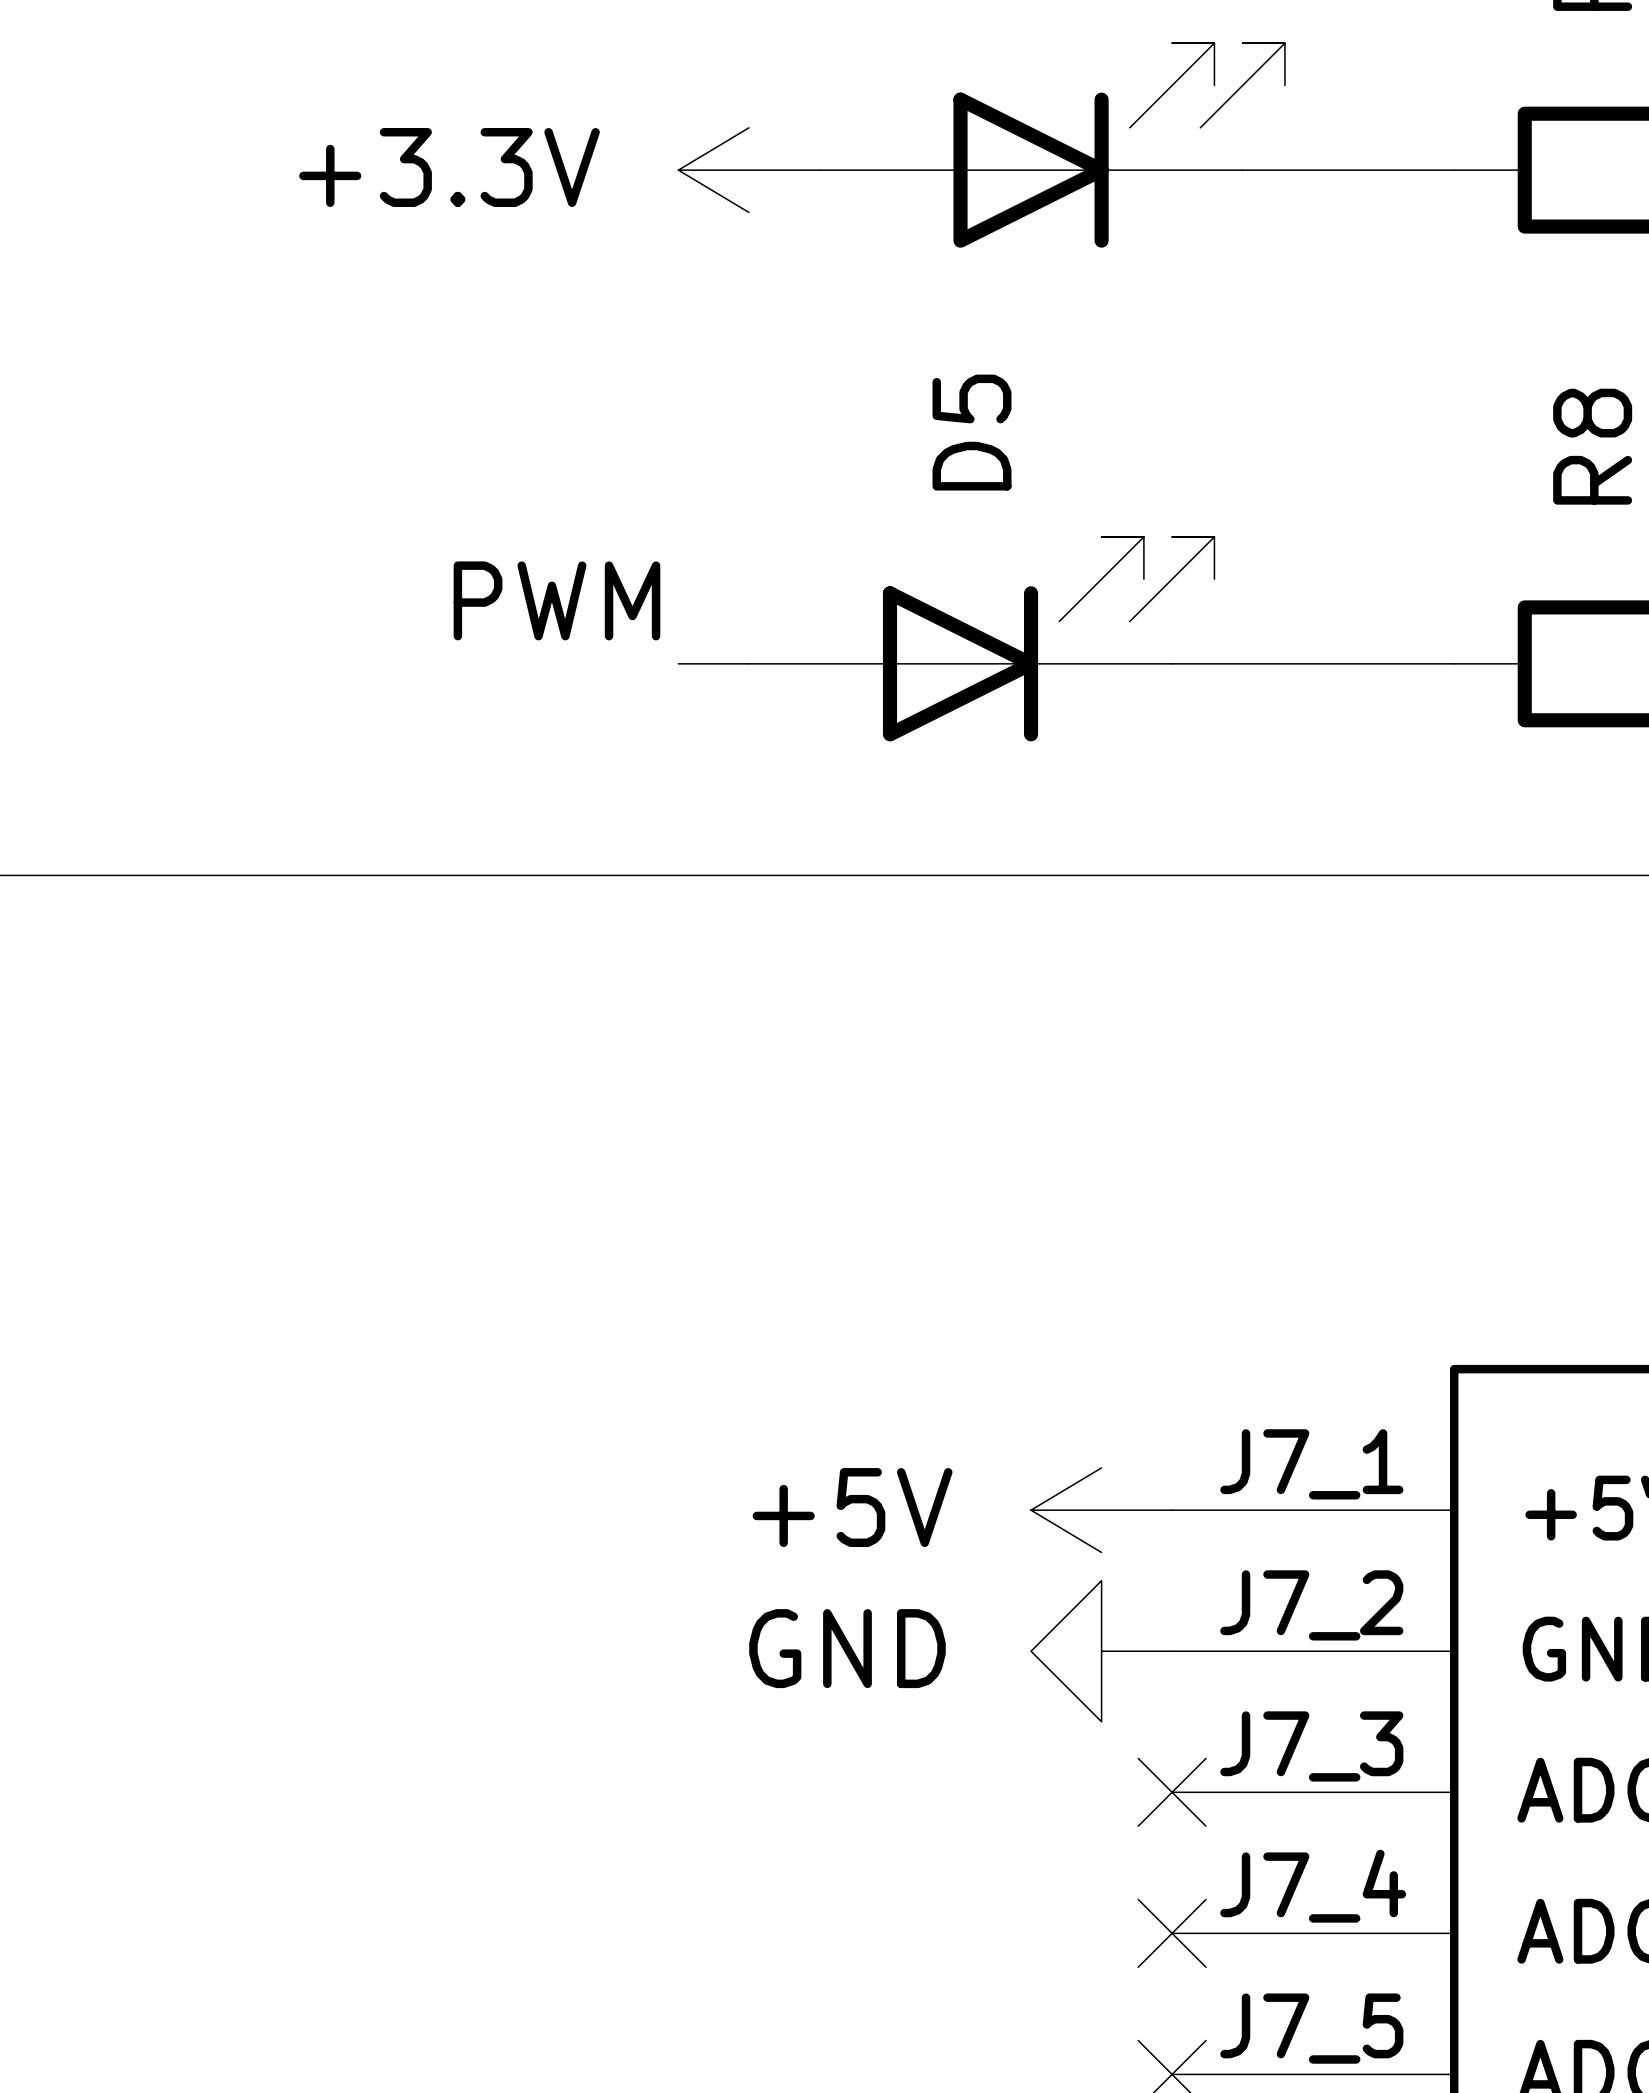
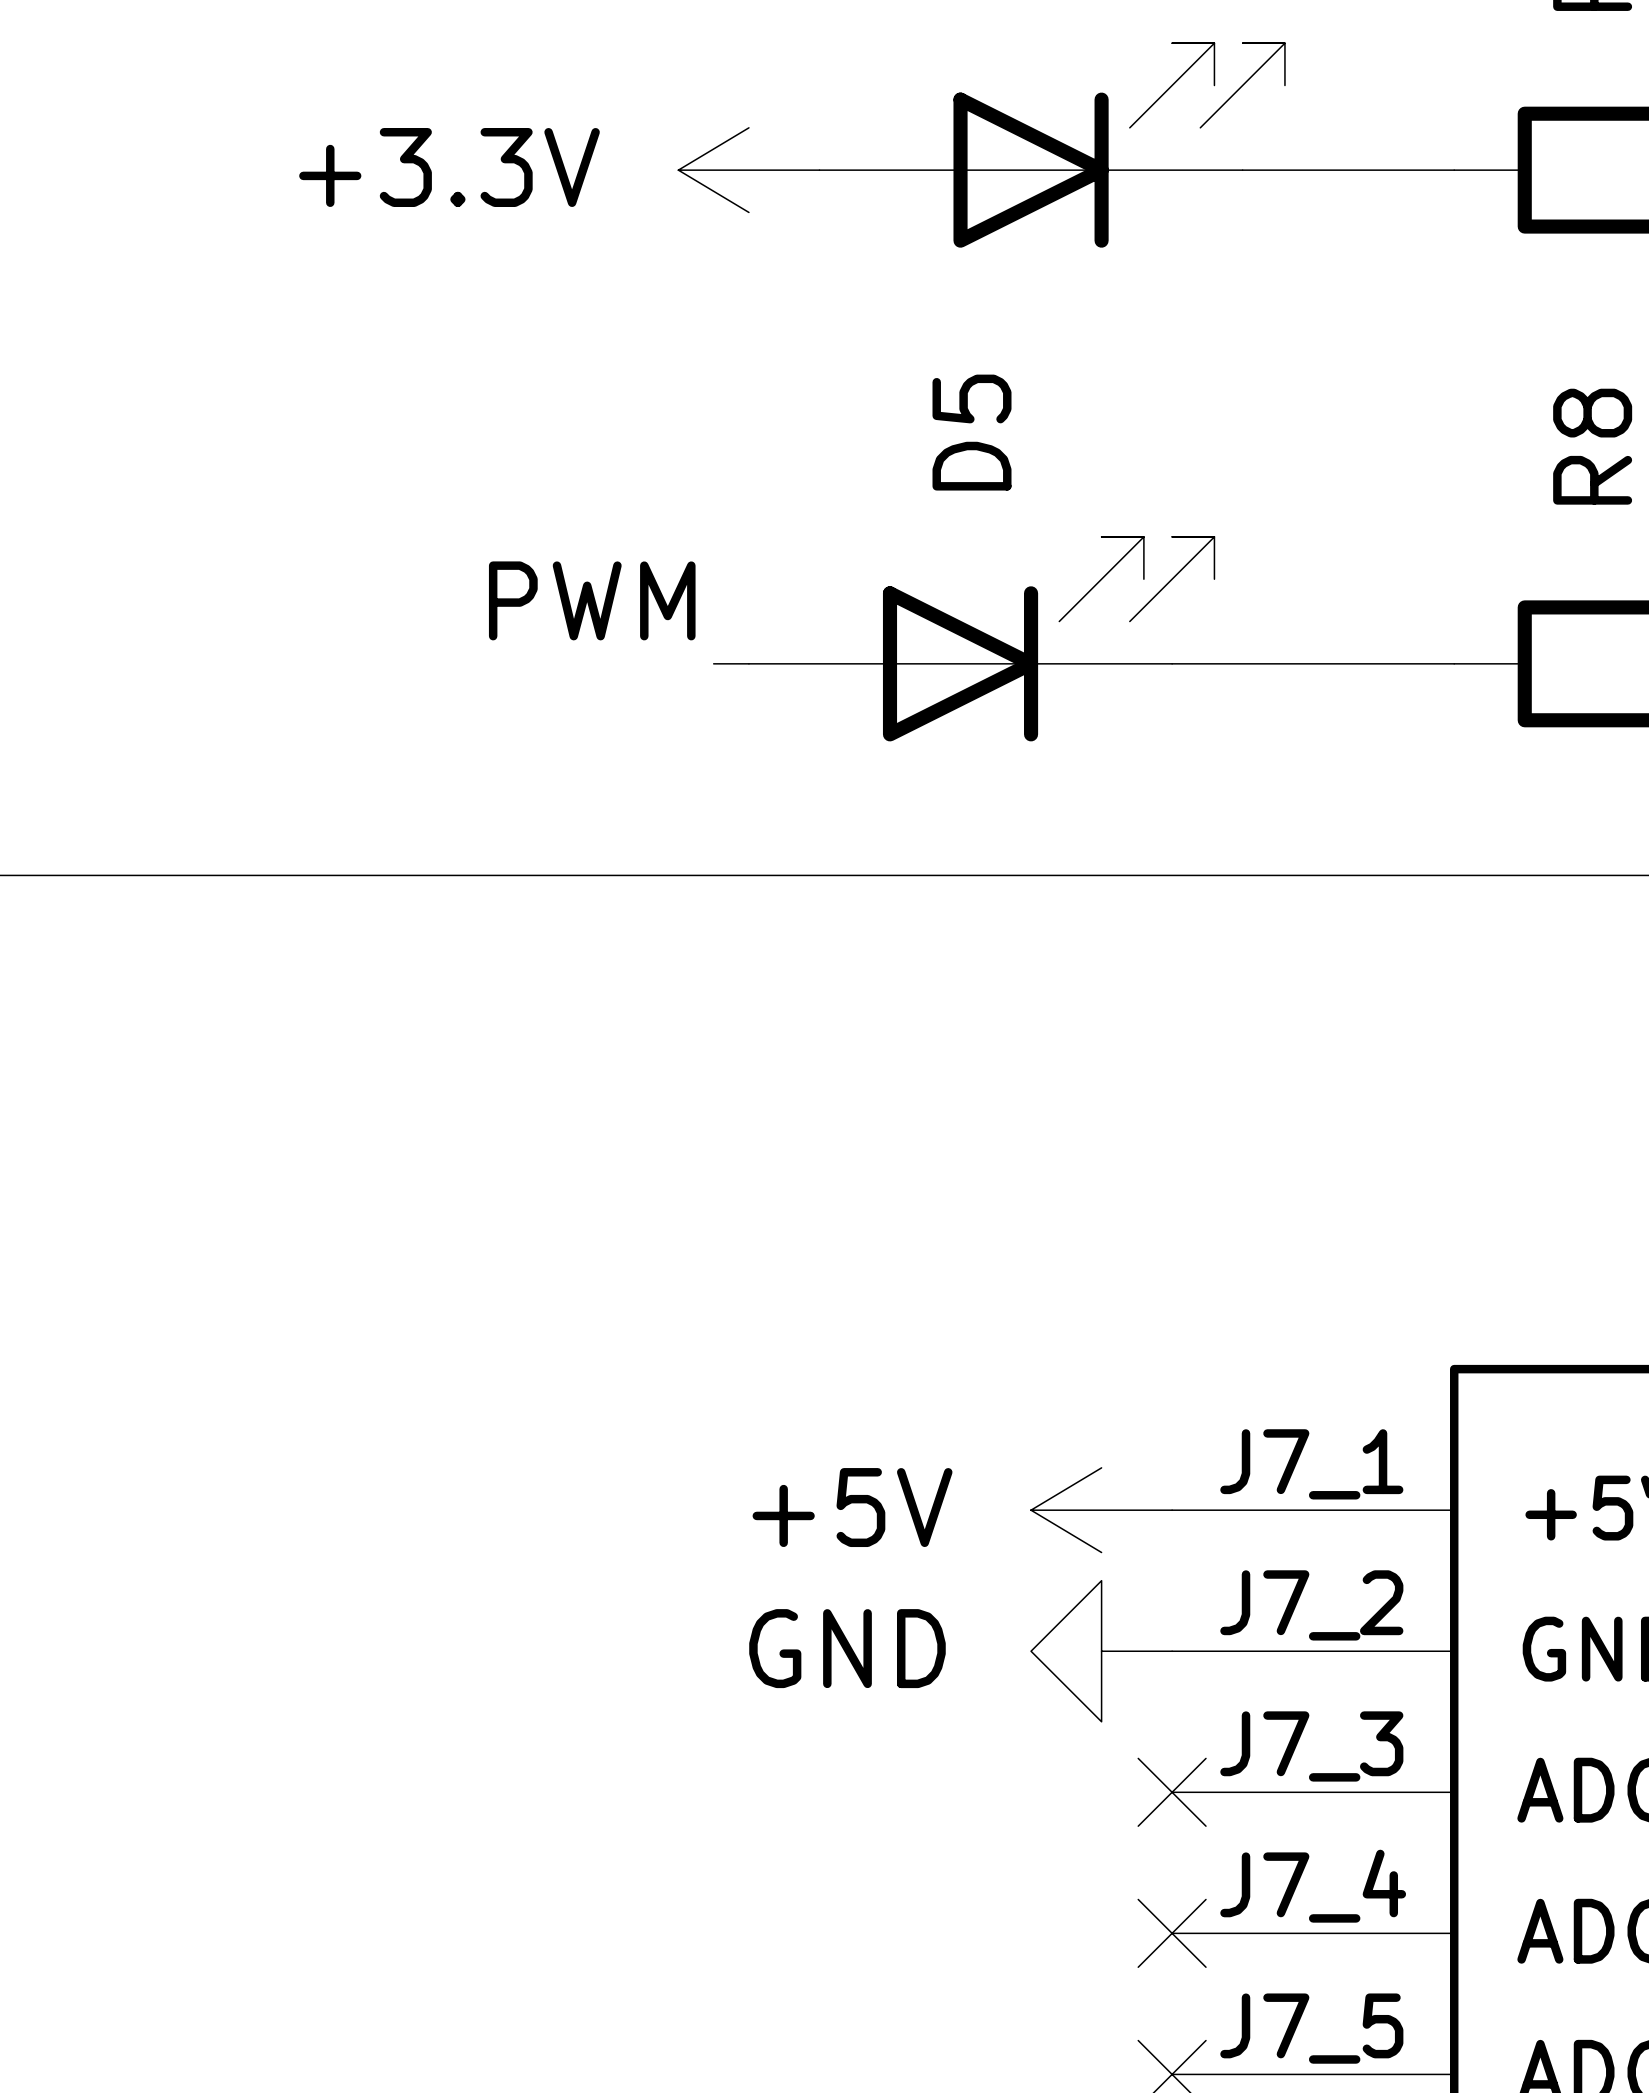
label position: PWM (556, 600) -> PWM (592, 600)
wire: (678, 663) (713, 663) -> none

